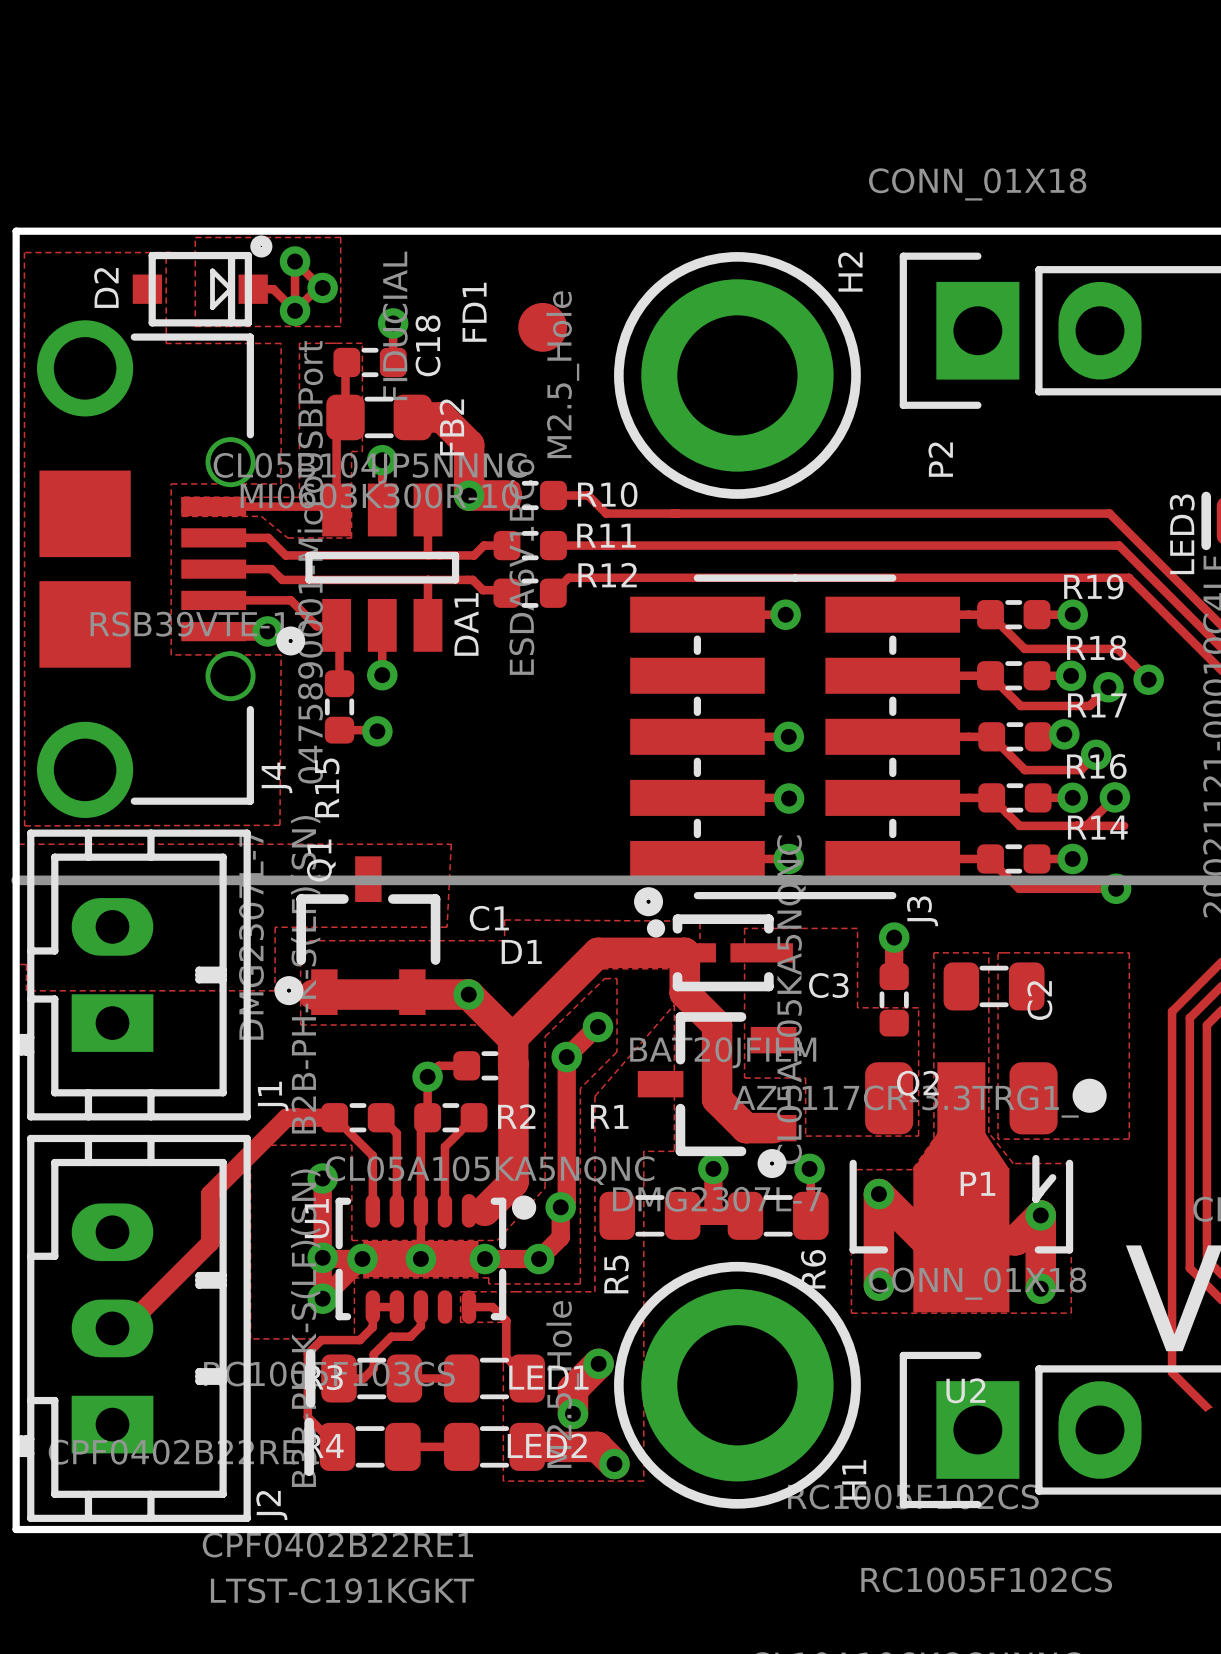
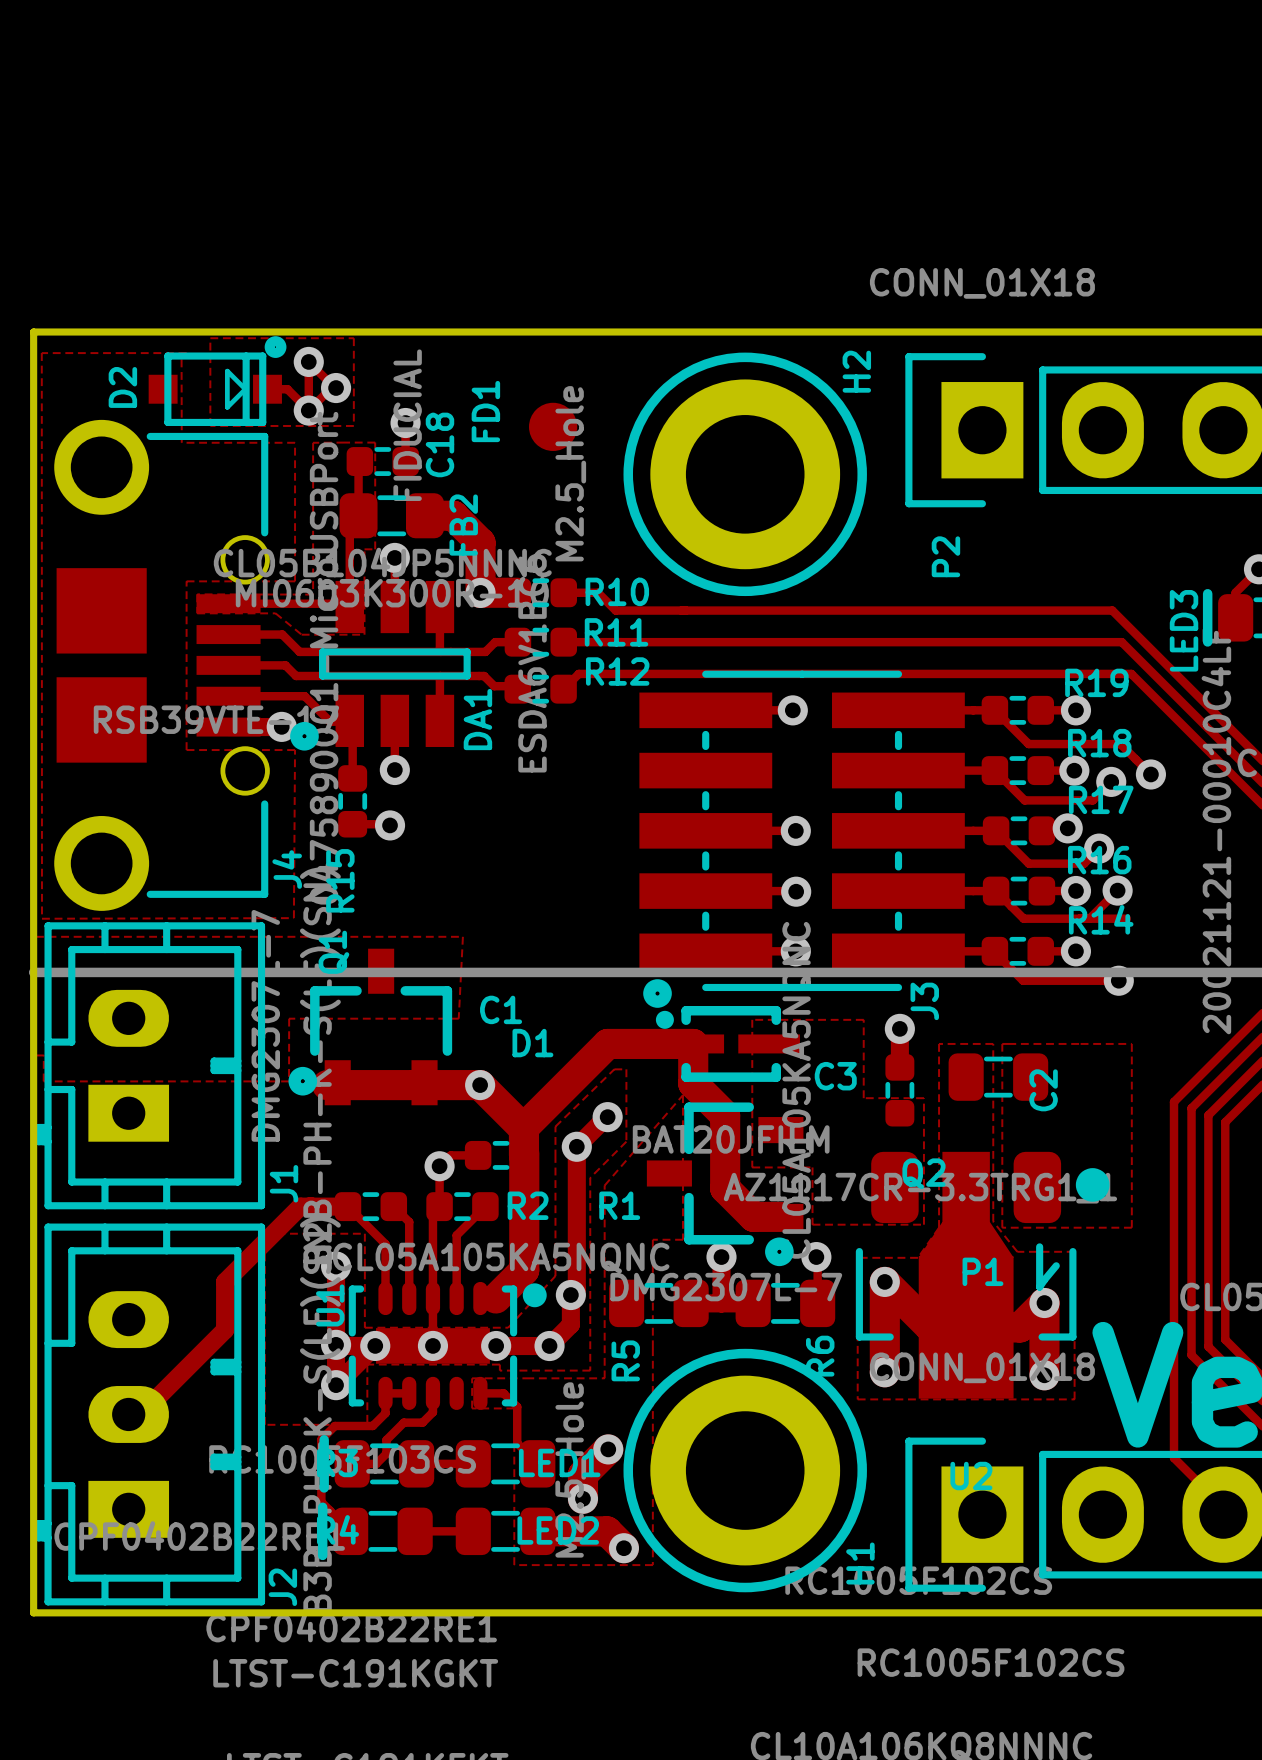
zone outline: (504, 919) (700, 921) (698, 968) (602, 968) (591, 957) (518, 1025) (300, 1025) (300, 940) (504, 940) (504, 919) -> none

